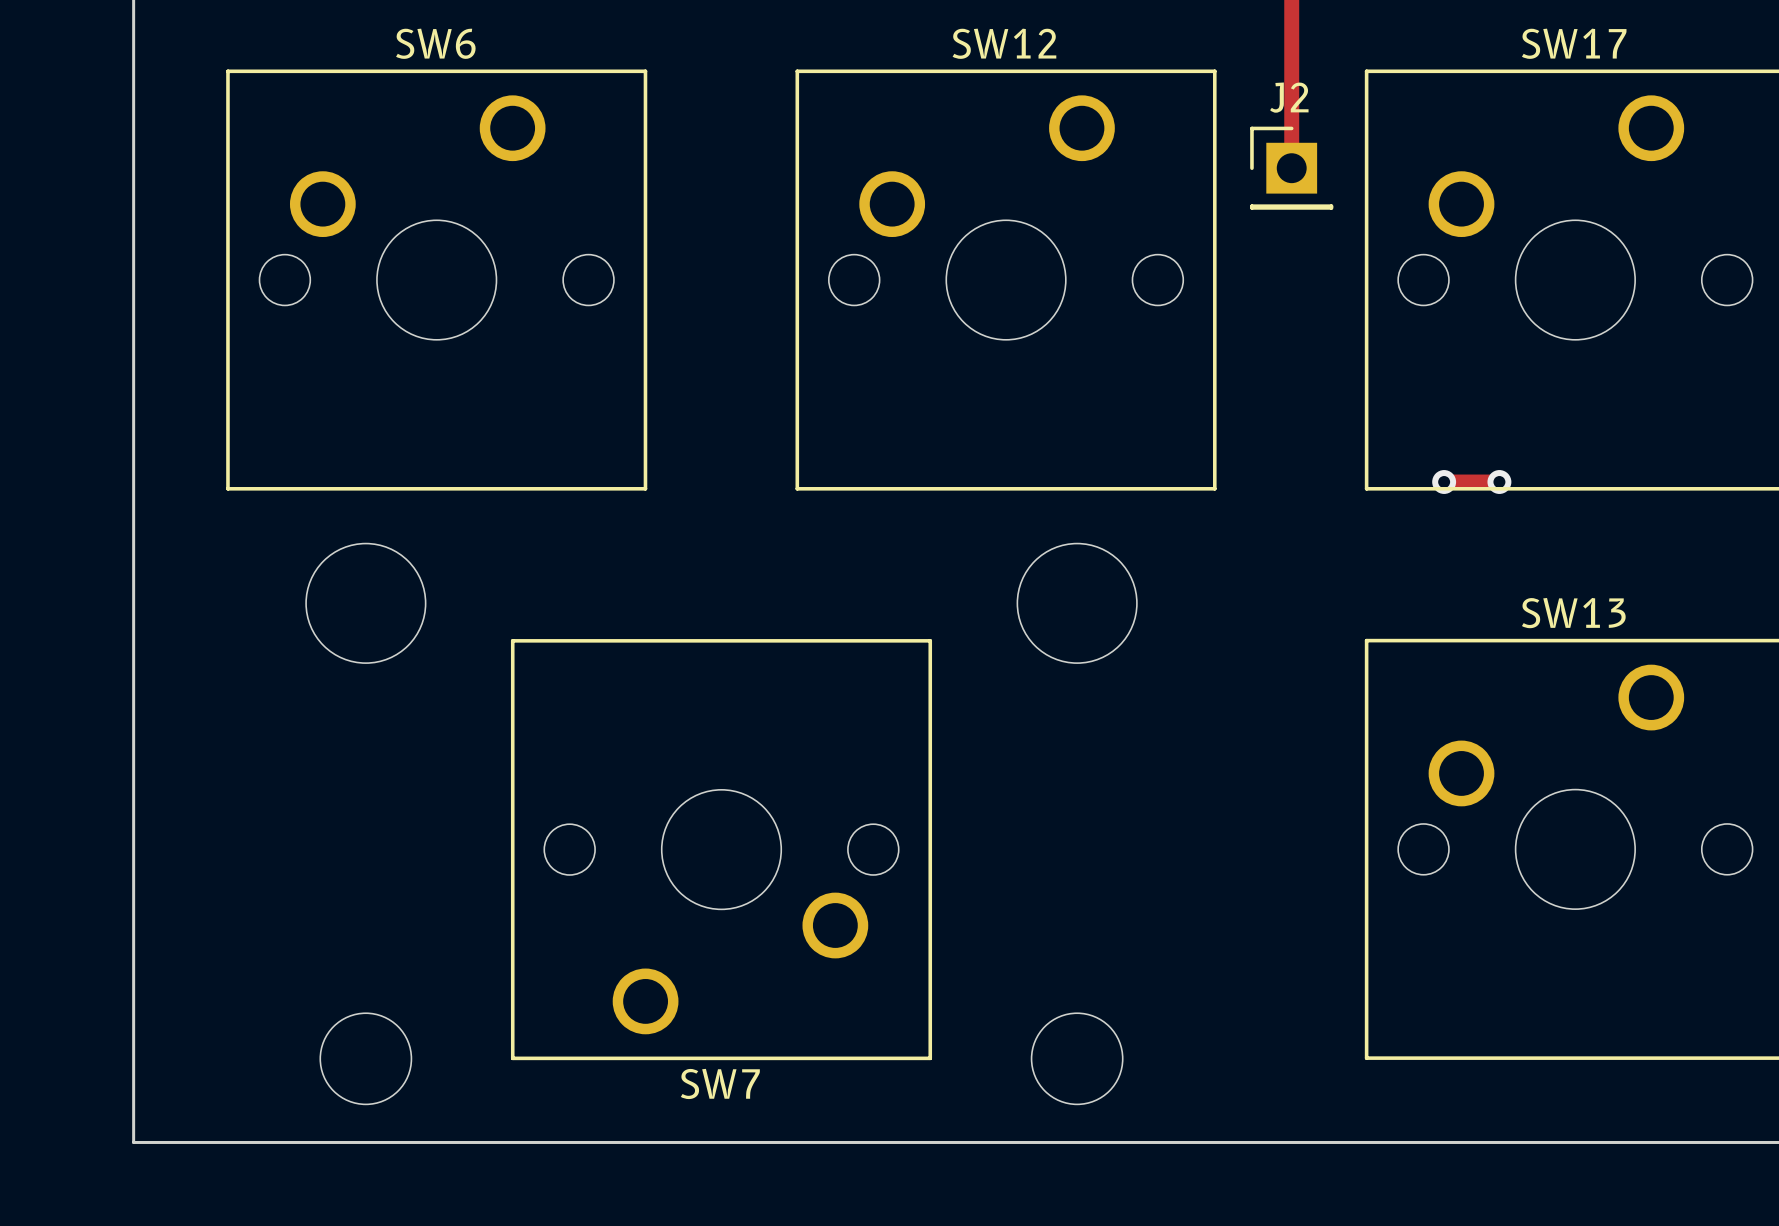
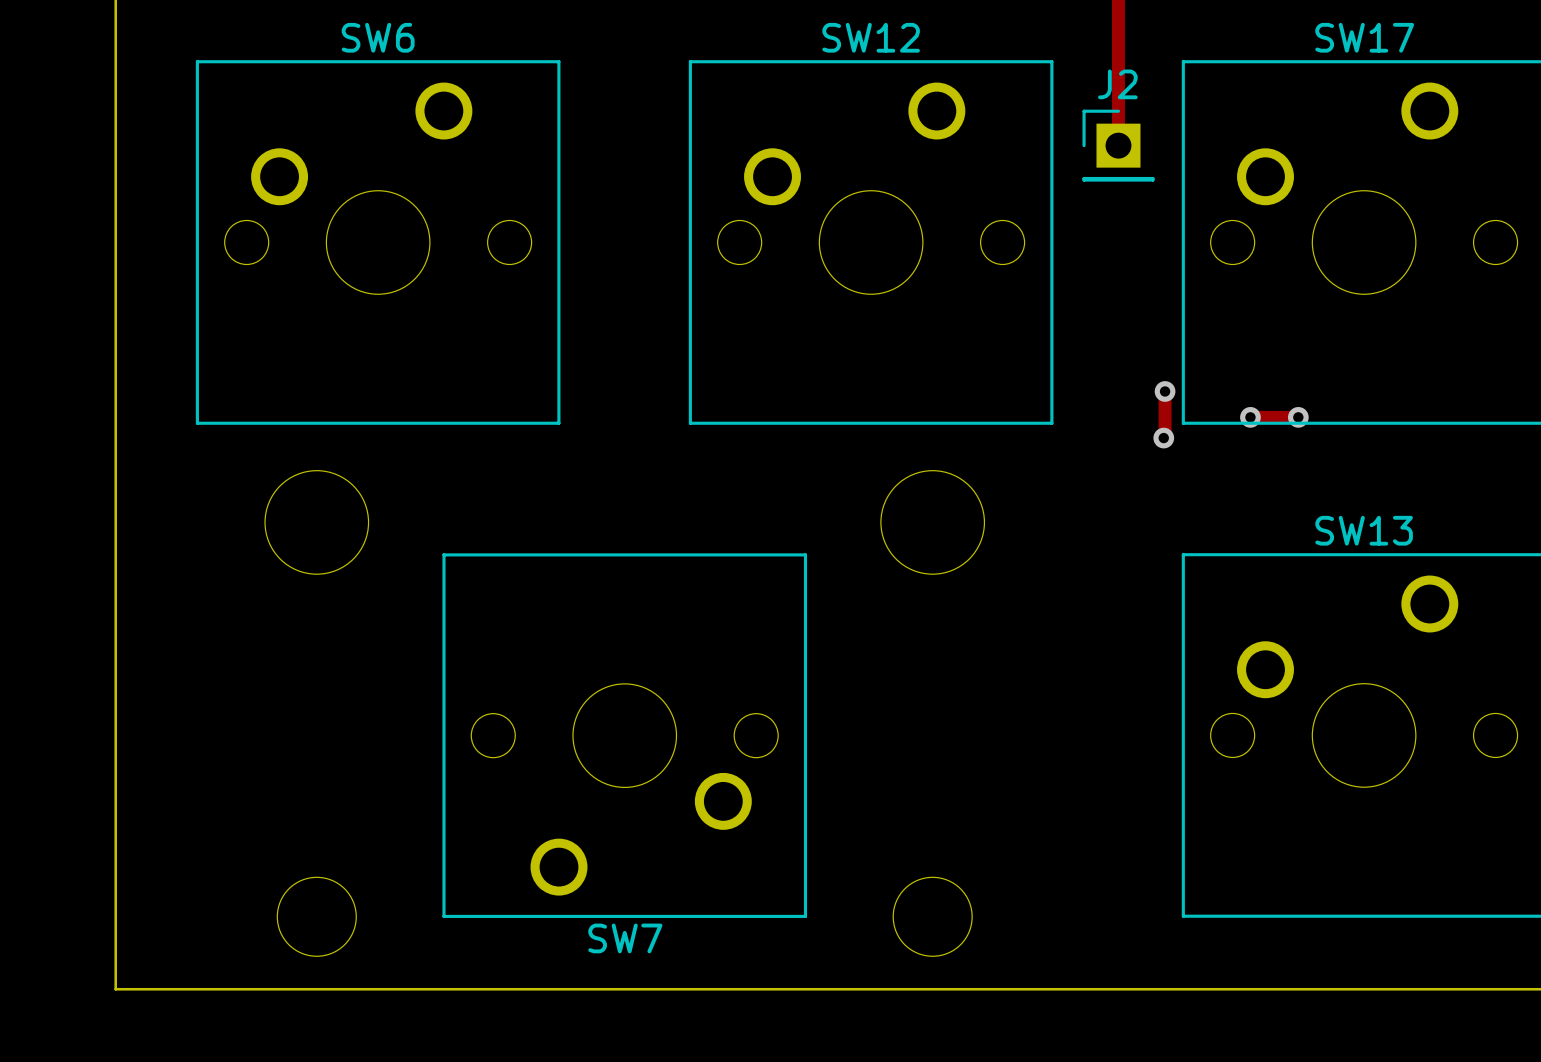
track: none -> (1165, 391) (1163, 438)
via: none -> (1165, 391)
via: none -> (1163, 438)

